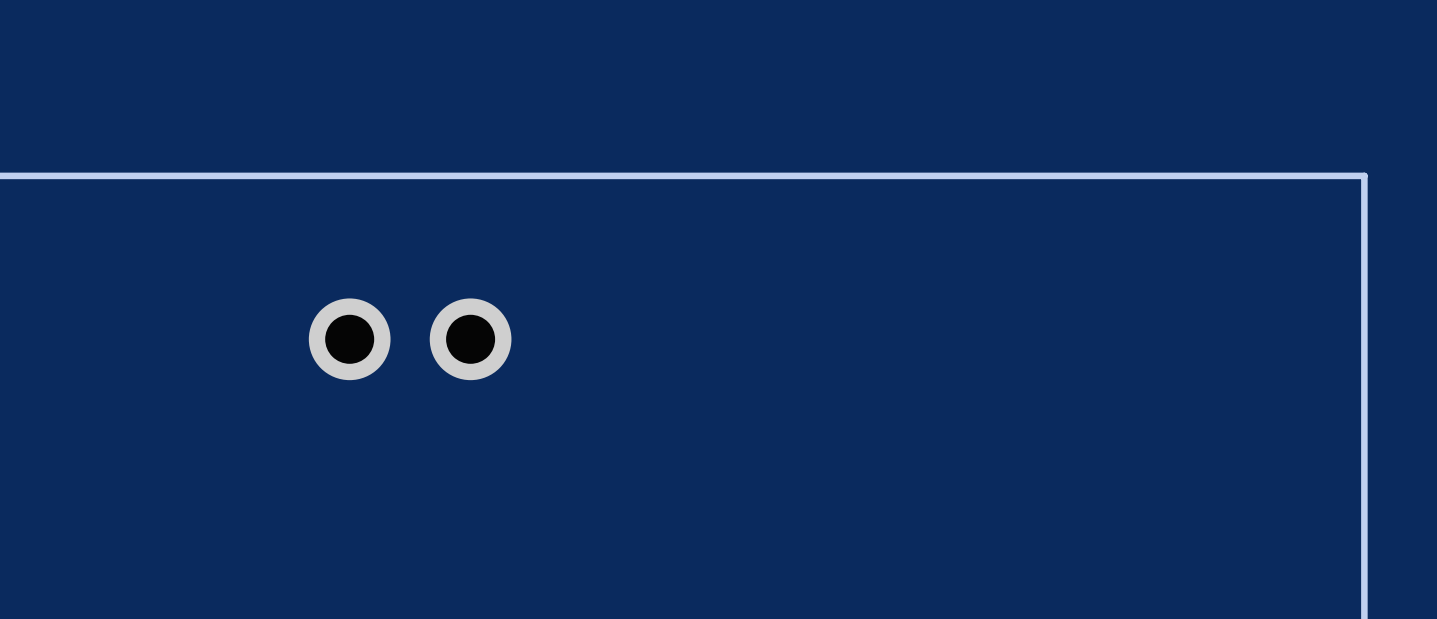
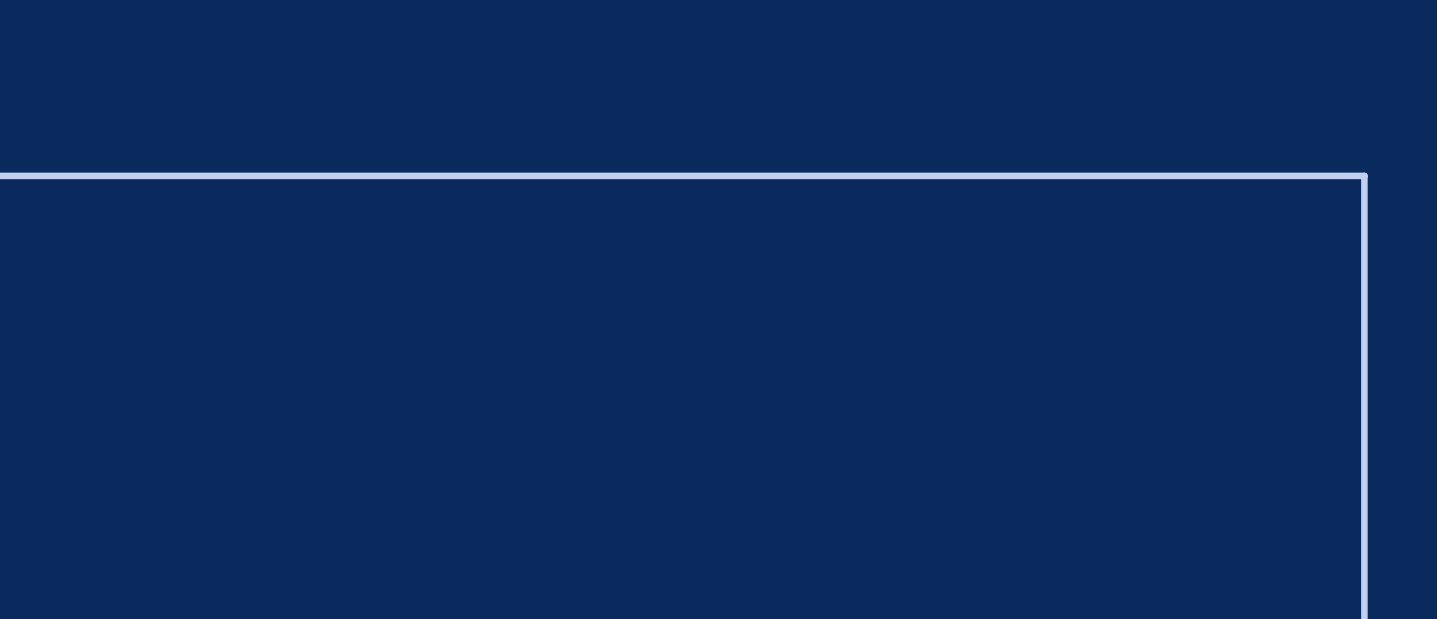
part: (349, 339) -> none
part: (470, 339) -> none

